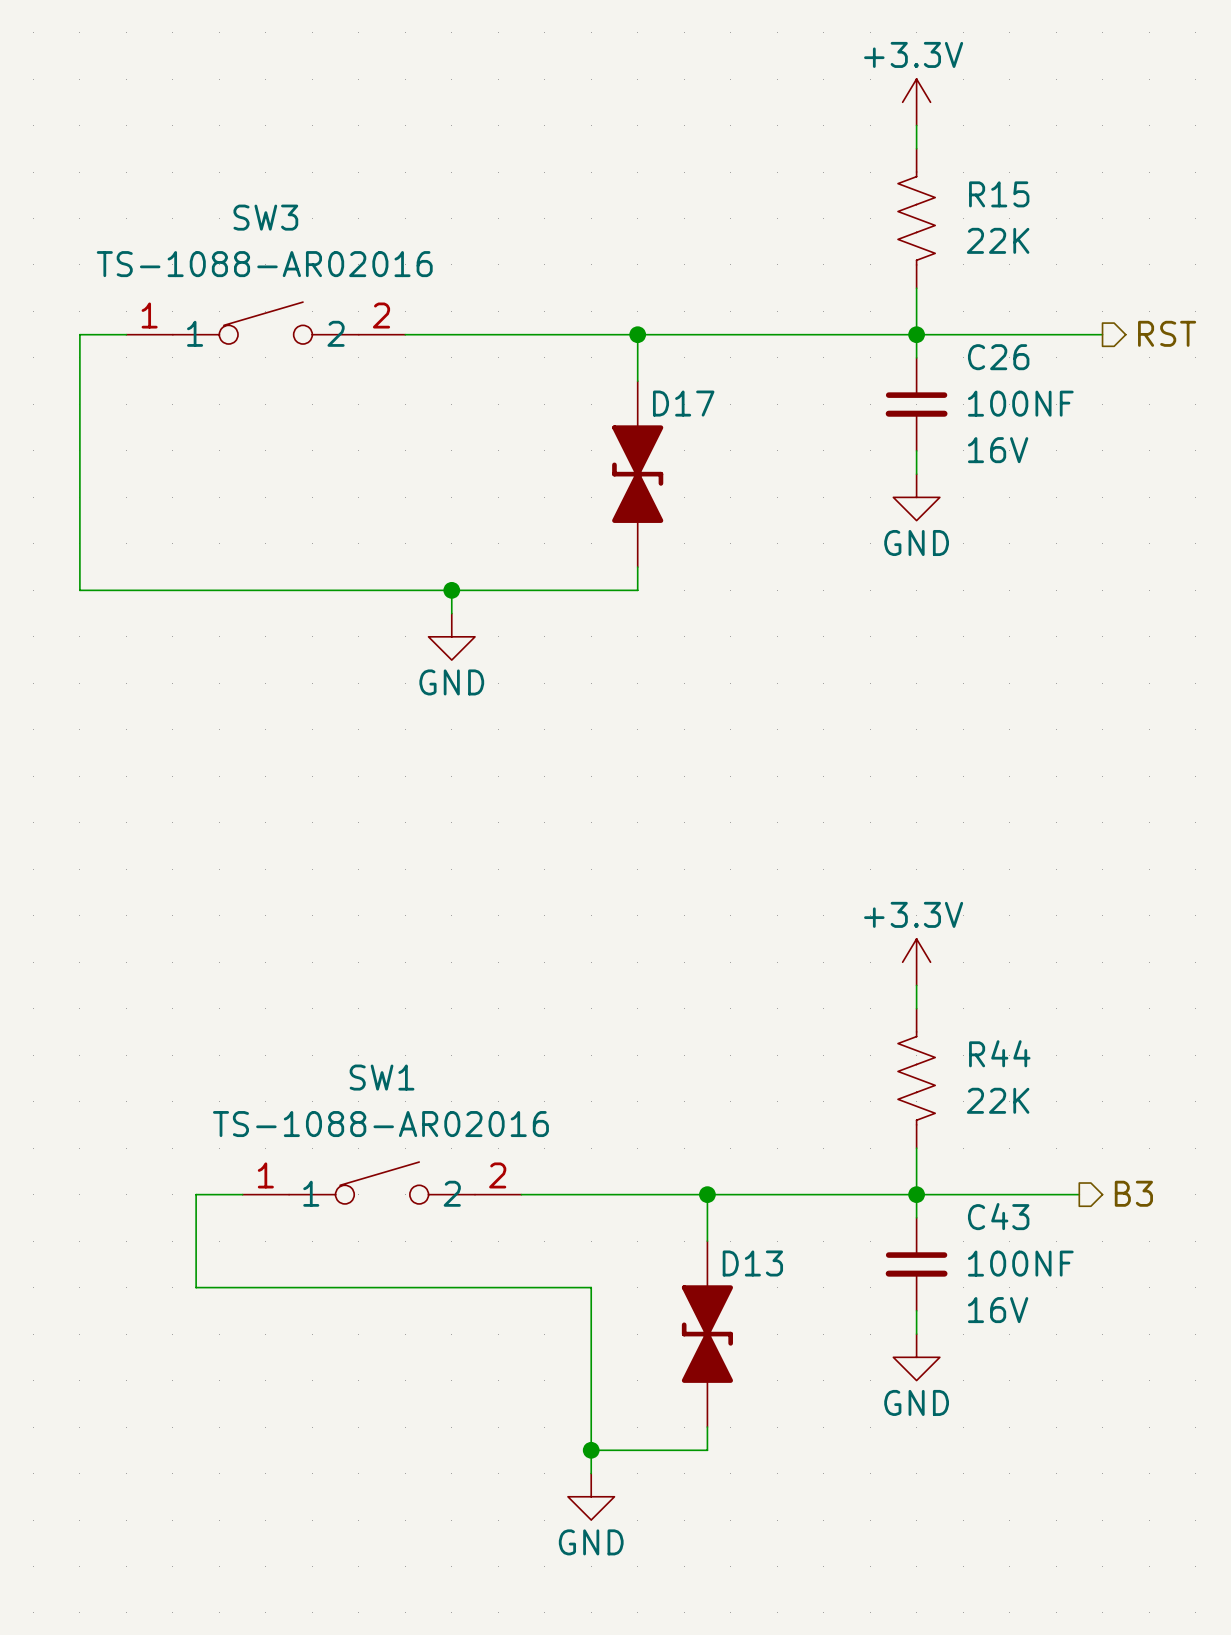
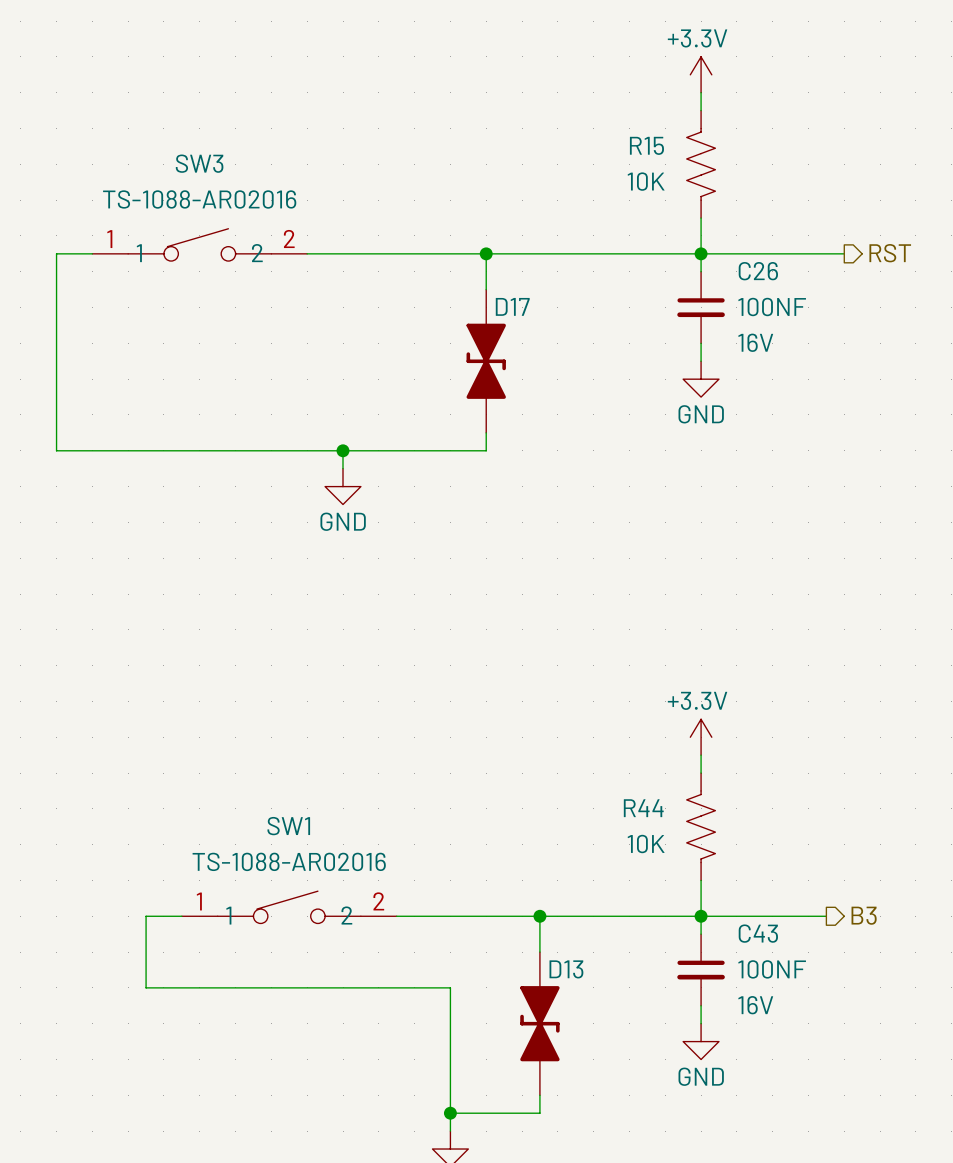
R15 name position: R15 (999, 194) -> R15 (646, 145)
R15 value: 22K (998, 240) -> 10K (646, 181)
R44 name position: R44 (999, 1053) -> R44 (643, 808)
R44 value: 22K (998, 1100) -> 10K (646, 844)

